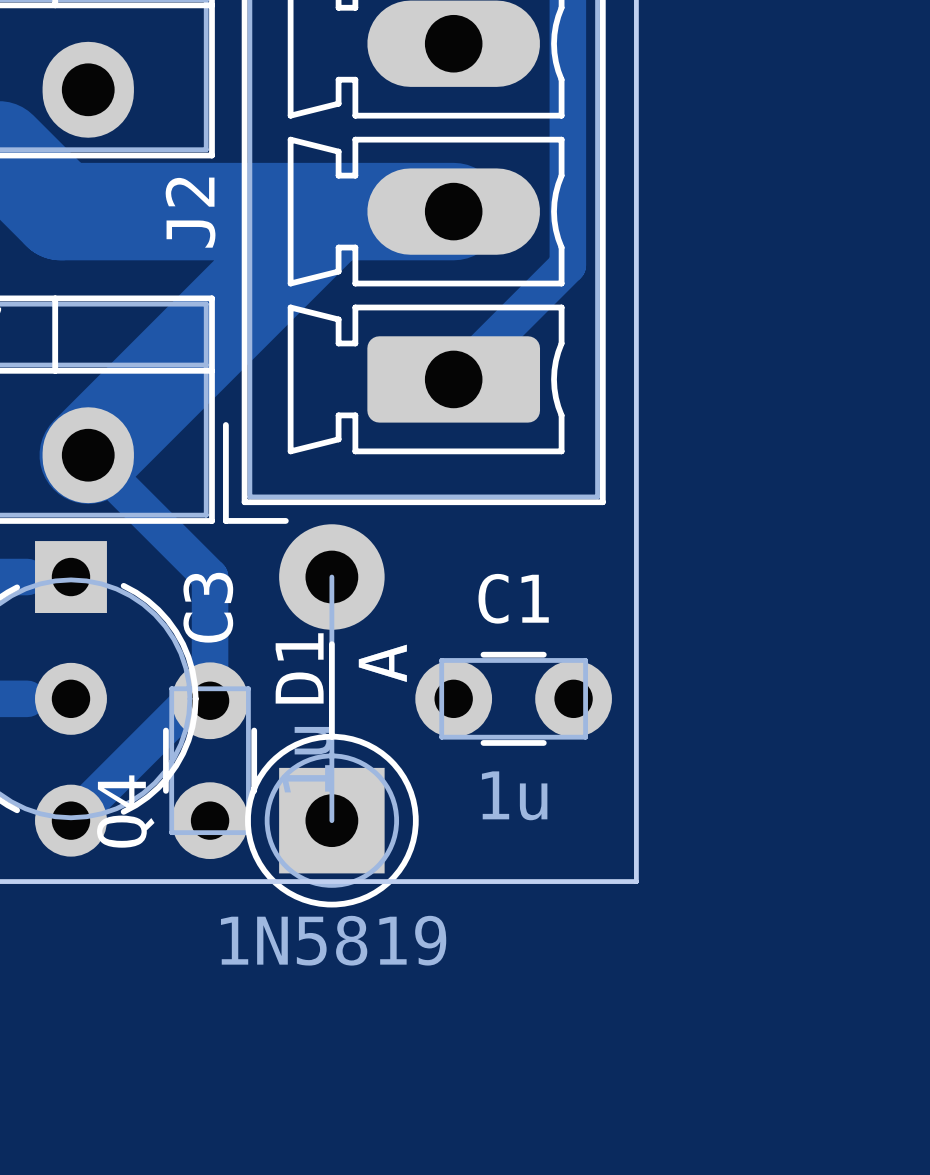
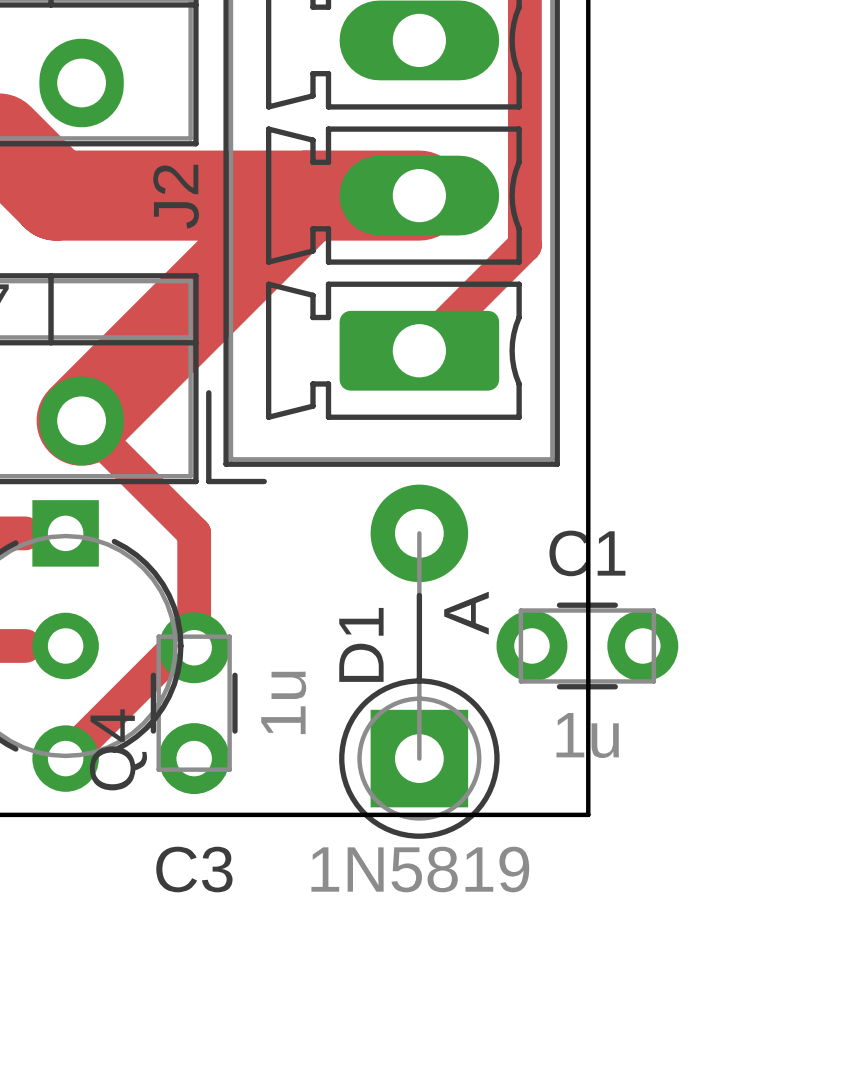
C3 name rotation: 0° (208, 607) -> 90° clockwise (194, 869)
C3 name position: C3 (208, 607) -> C3 (194, 869)
D1 name position: D1 (299, 668) -> D1 (361, 644)
C1 position: (513, 698) -> (587, 645)
D1 position: (331, 715) -> (419, 661)

